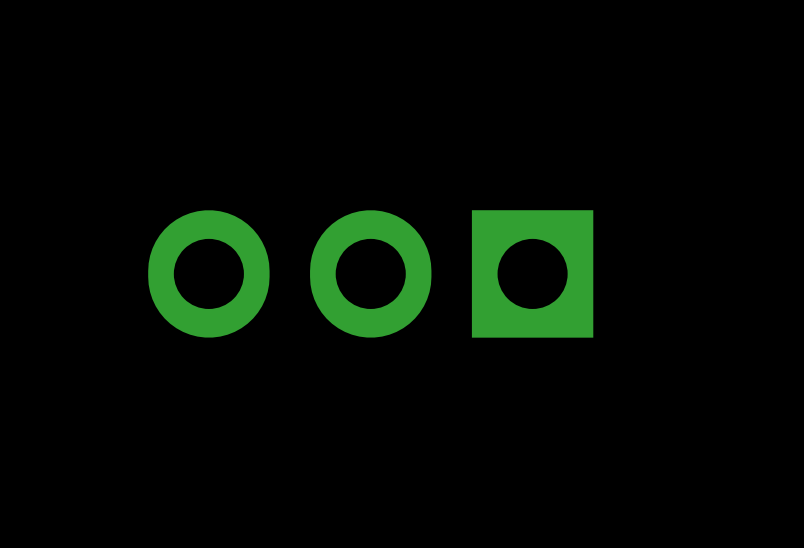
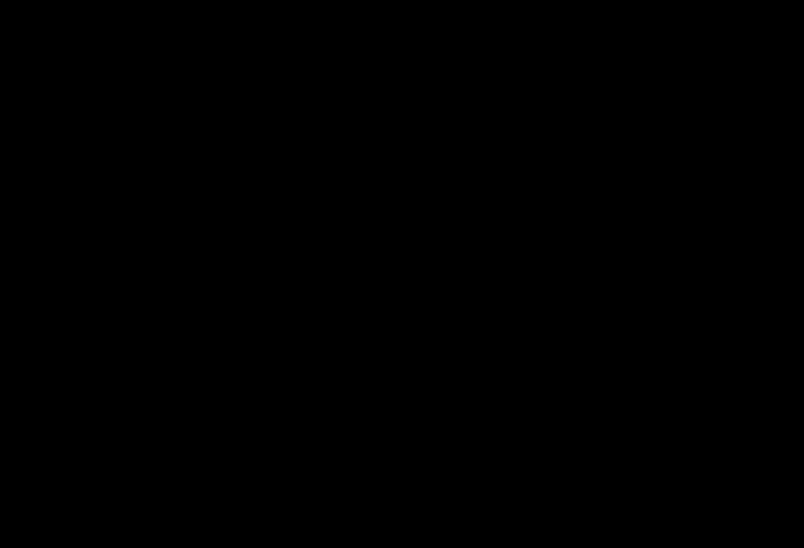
part: (370, 273) -> none

